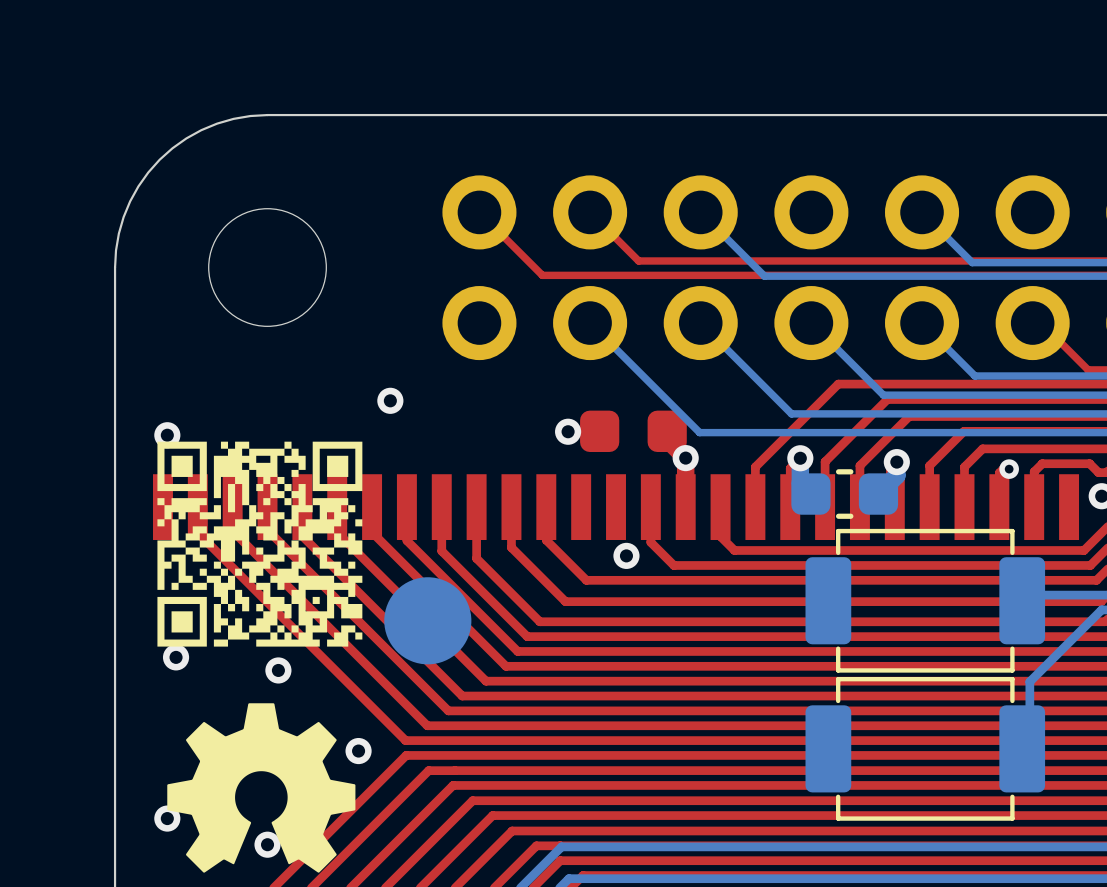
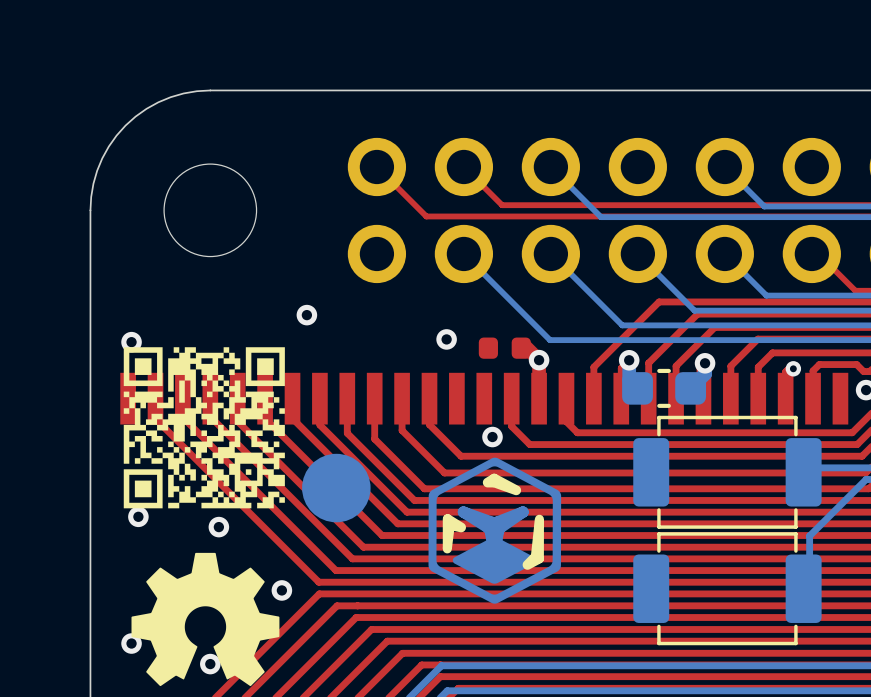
part footprint: [580, 410, 687, 453] -> [478, 337, 531, 359]
drawing: none -> [428, 457, 562, 604]

